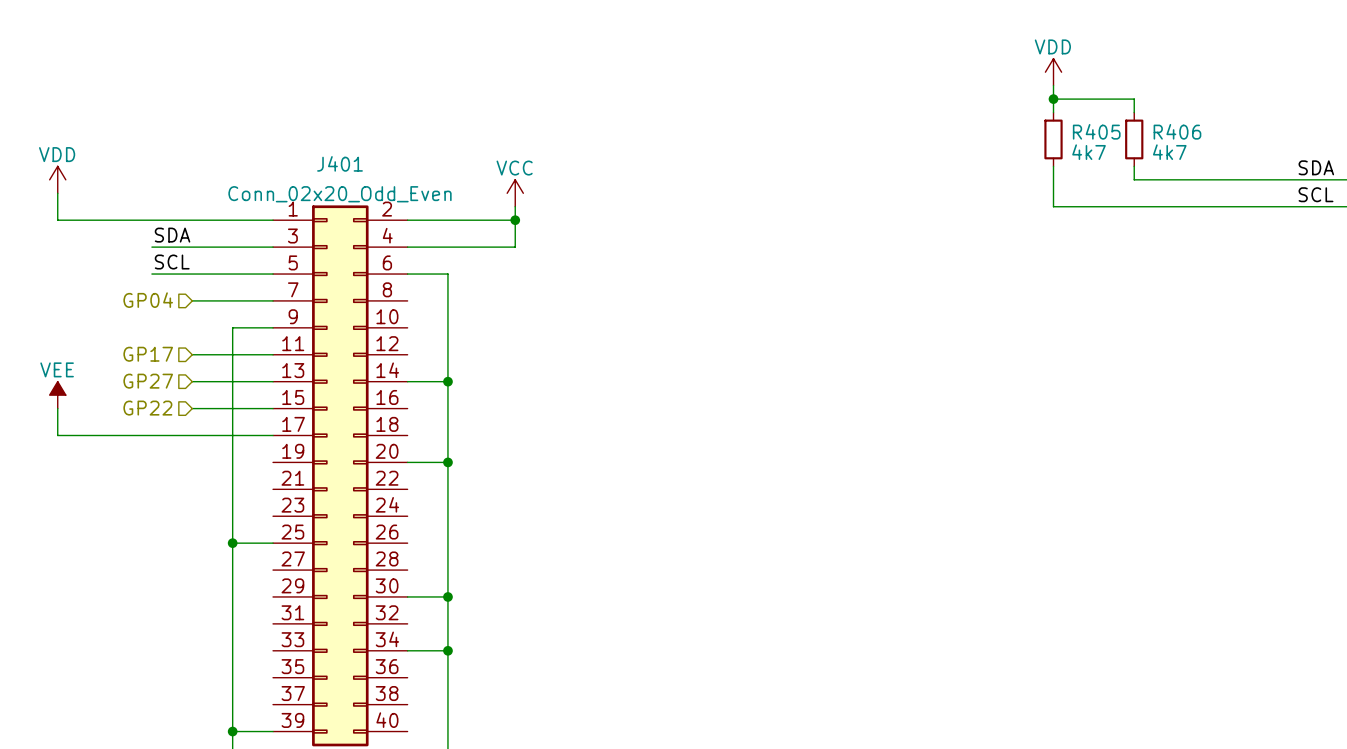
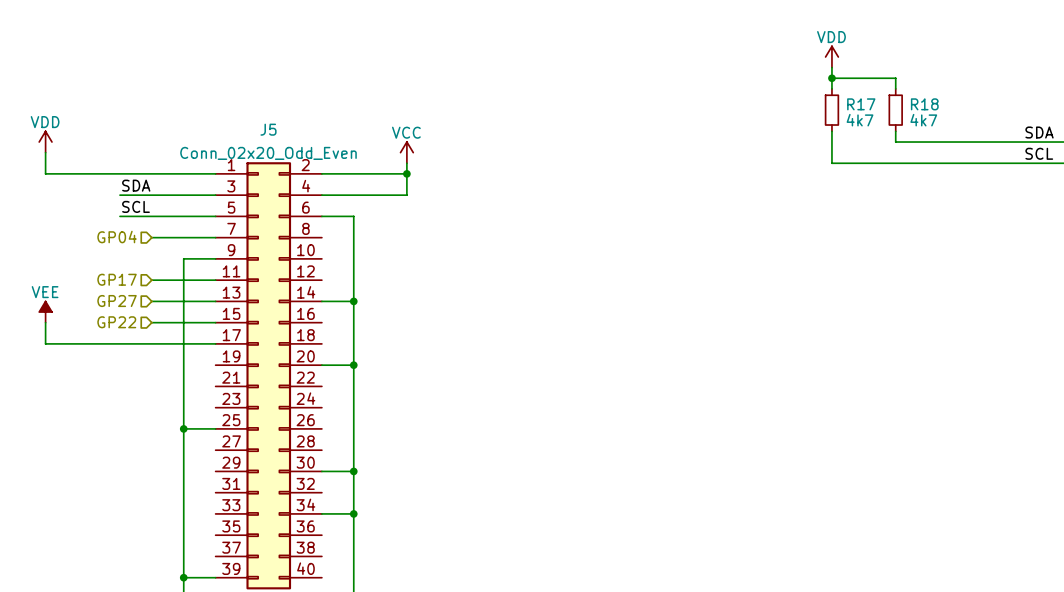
R405 name: R405 (1096, 131) -> R17 (861, 104)
R406 name: R406 (1177, 131) -> R18 (924, 104)
J401 name: J401 (340, 163) -> J5 (268, 129)

